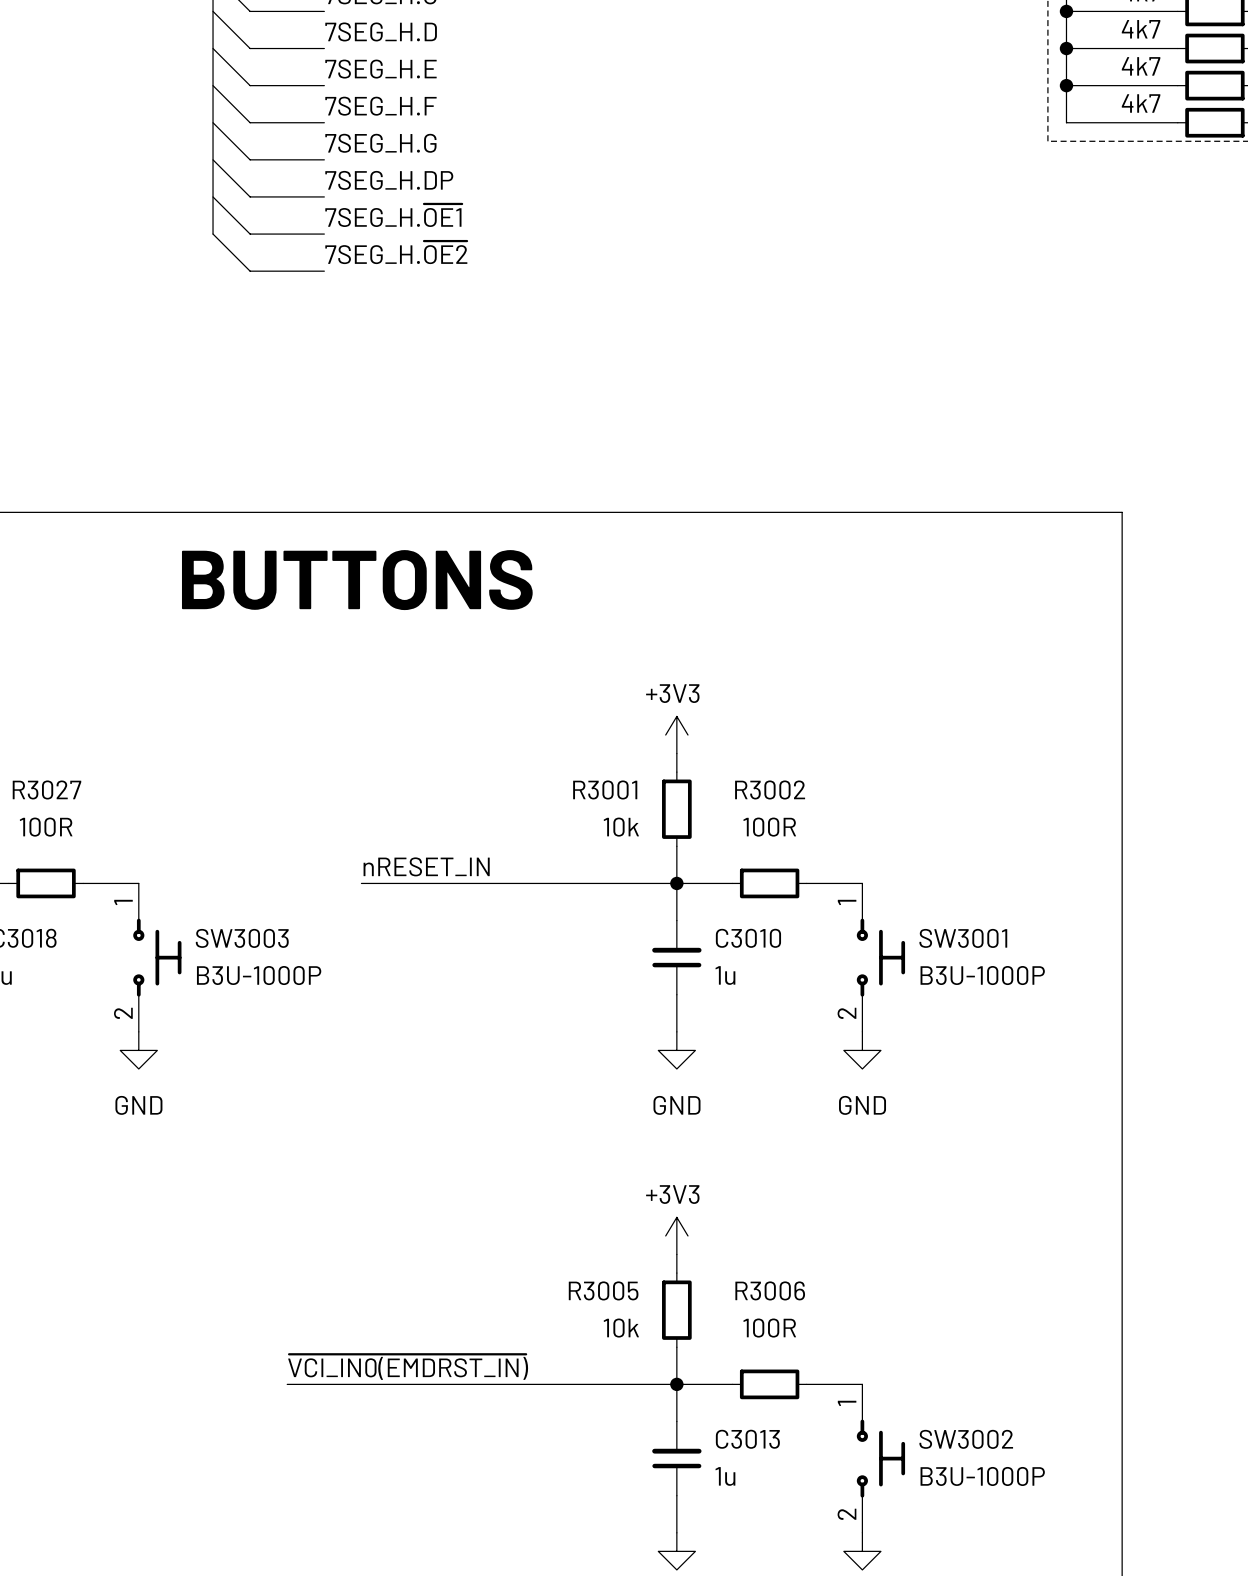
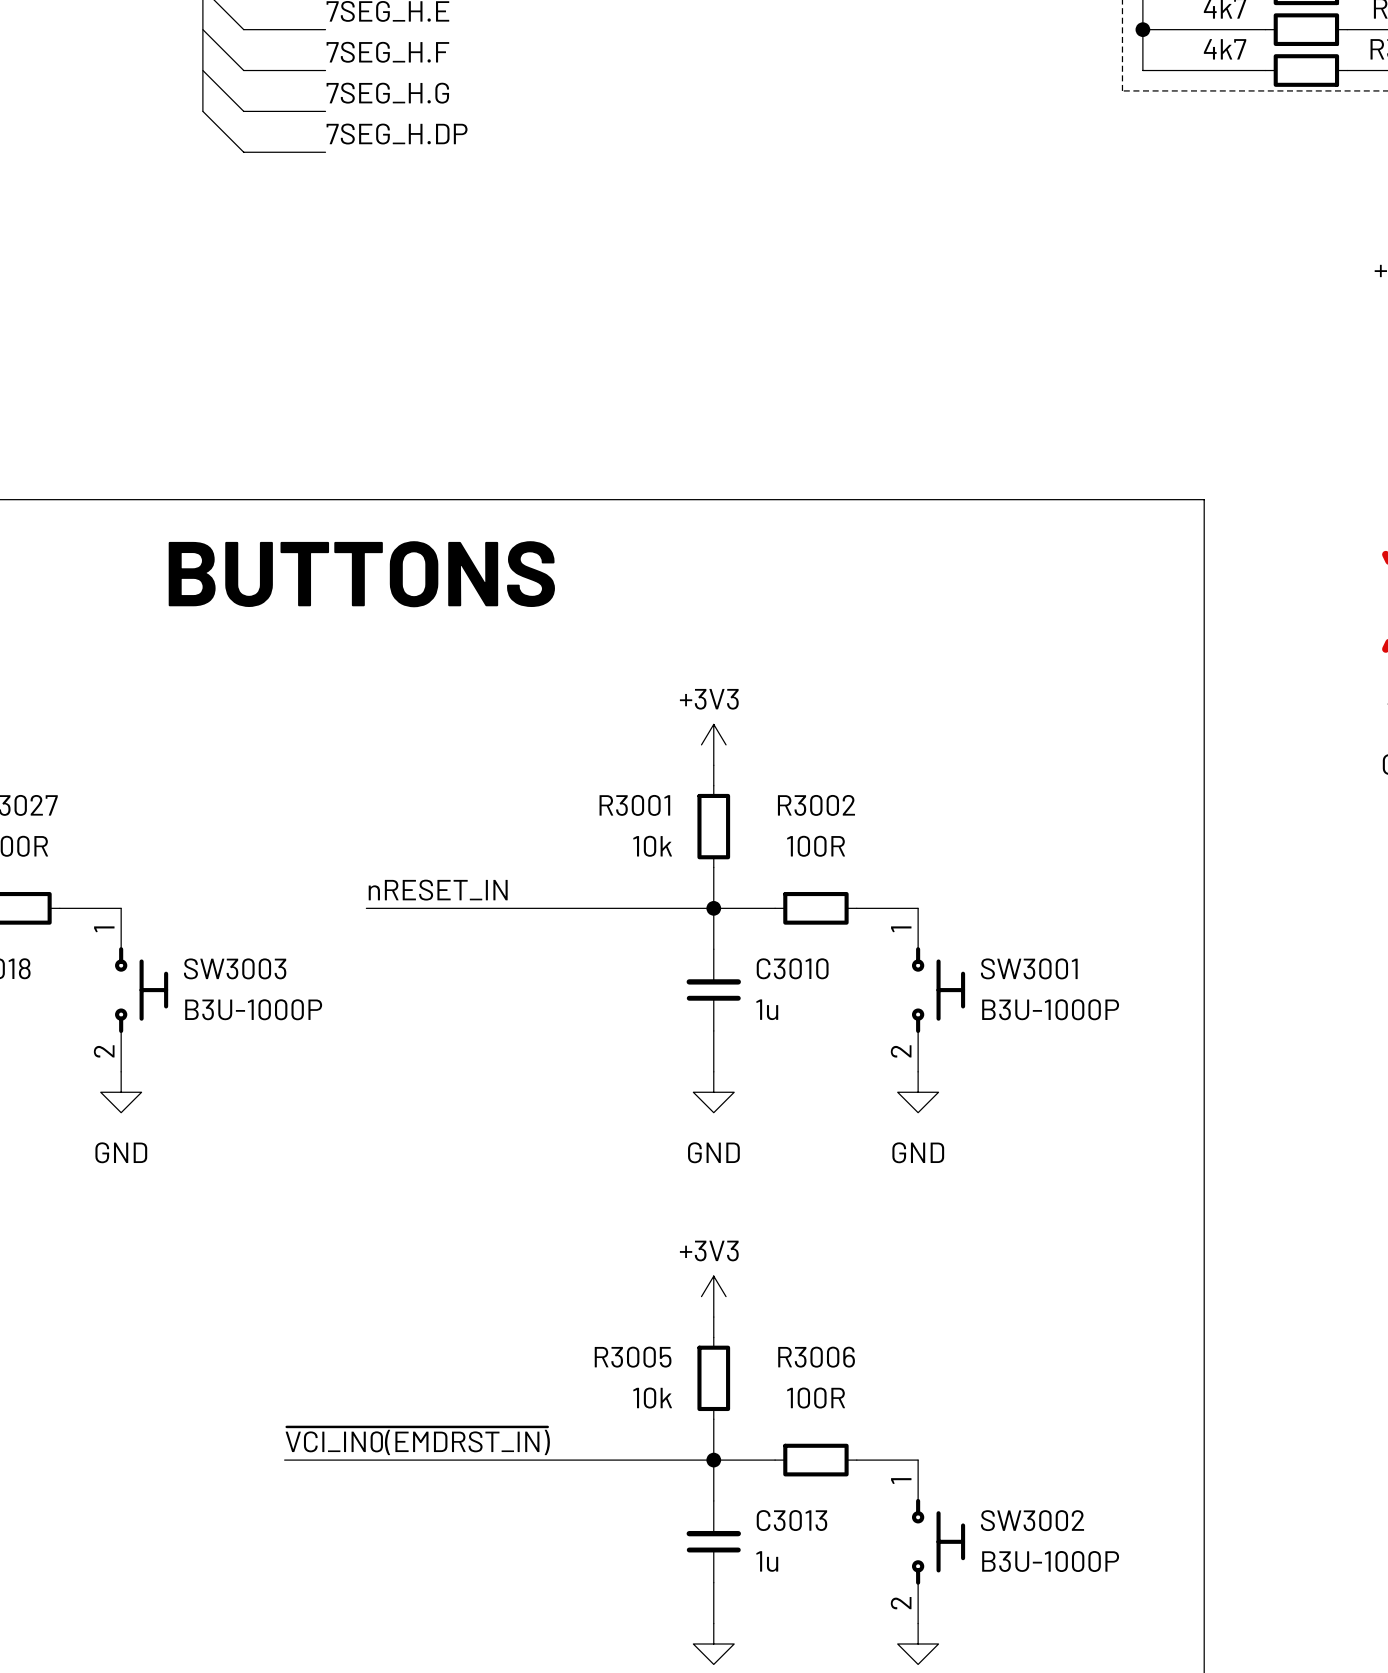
bus: (213, 159) (213, 234) -> none
wire: (213, 196) (250, 234) (324, 234) -> none
label: 7SEG_H.~{OE1} (393, 215) -> none
wire: (213, 234) (250, 271) (324, 271) -> none
label: 7SEG_H.~{OE2} (396, 252) -> none

